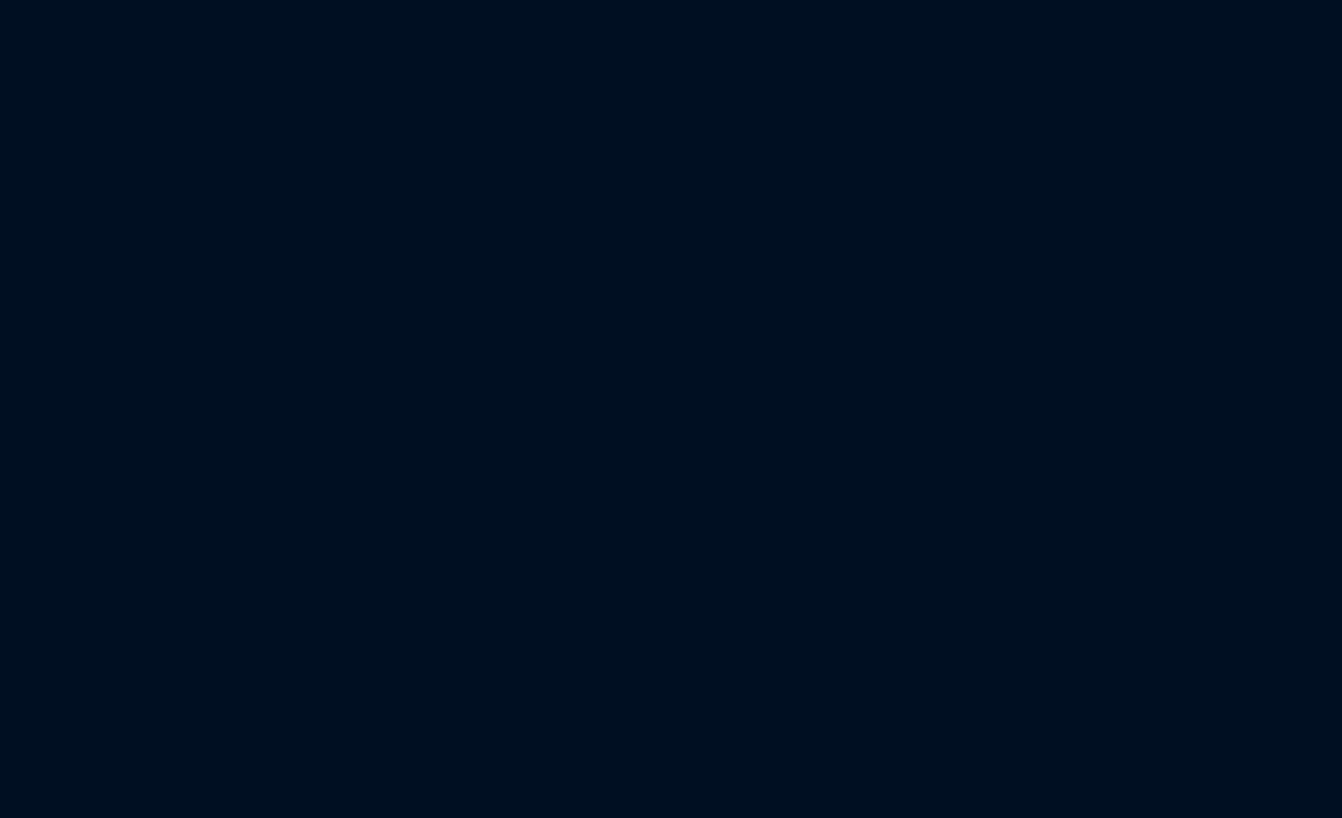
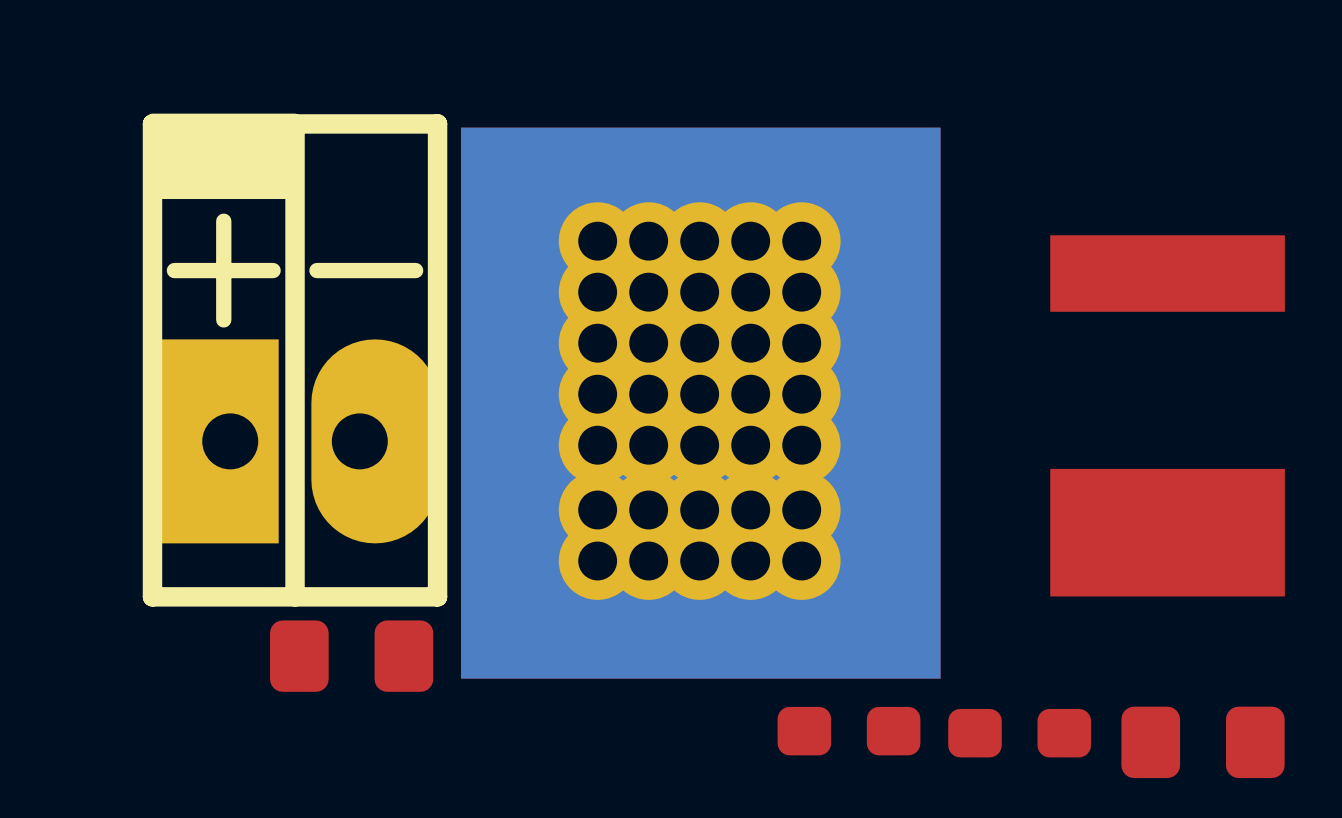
part: none -> (295, 360)
part: none -> (872, 403)
part: none -> (351, 656)
part: none -> (848, 731)
part: none -> (1019, 733)
part: none -> (1203, 742)

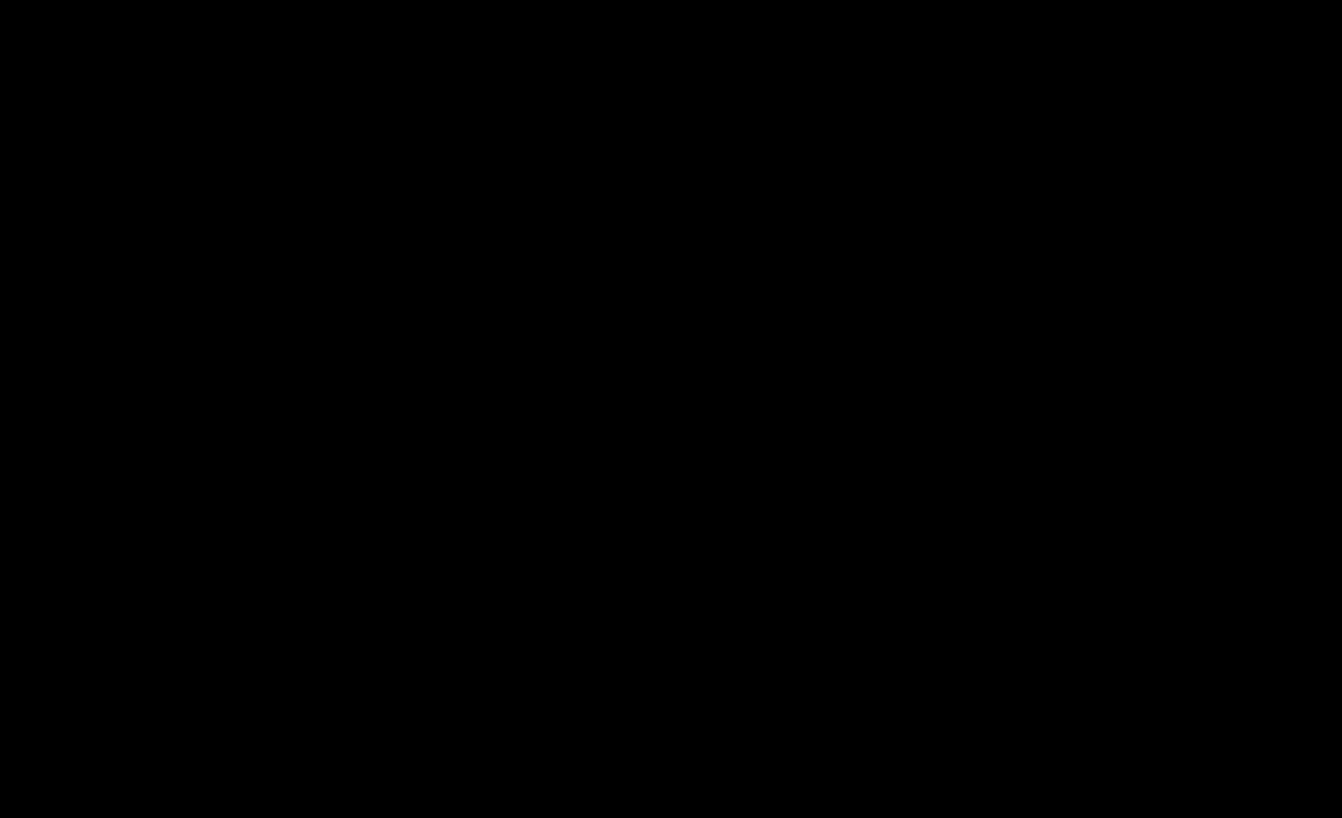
part: (295, 360) -> none
part: (872, 403) -> none
part: (351, 656) -> none
part: (848, 731) -> none
part: (1019, 733) -> none
part: (1203, 742) -> none

